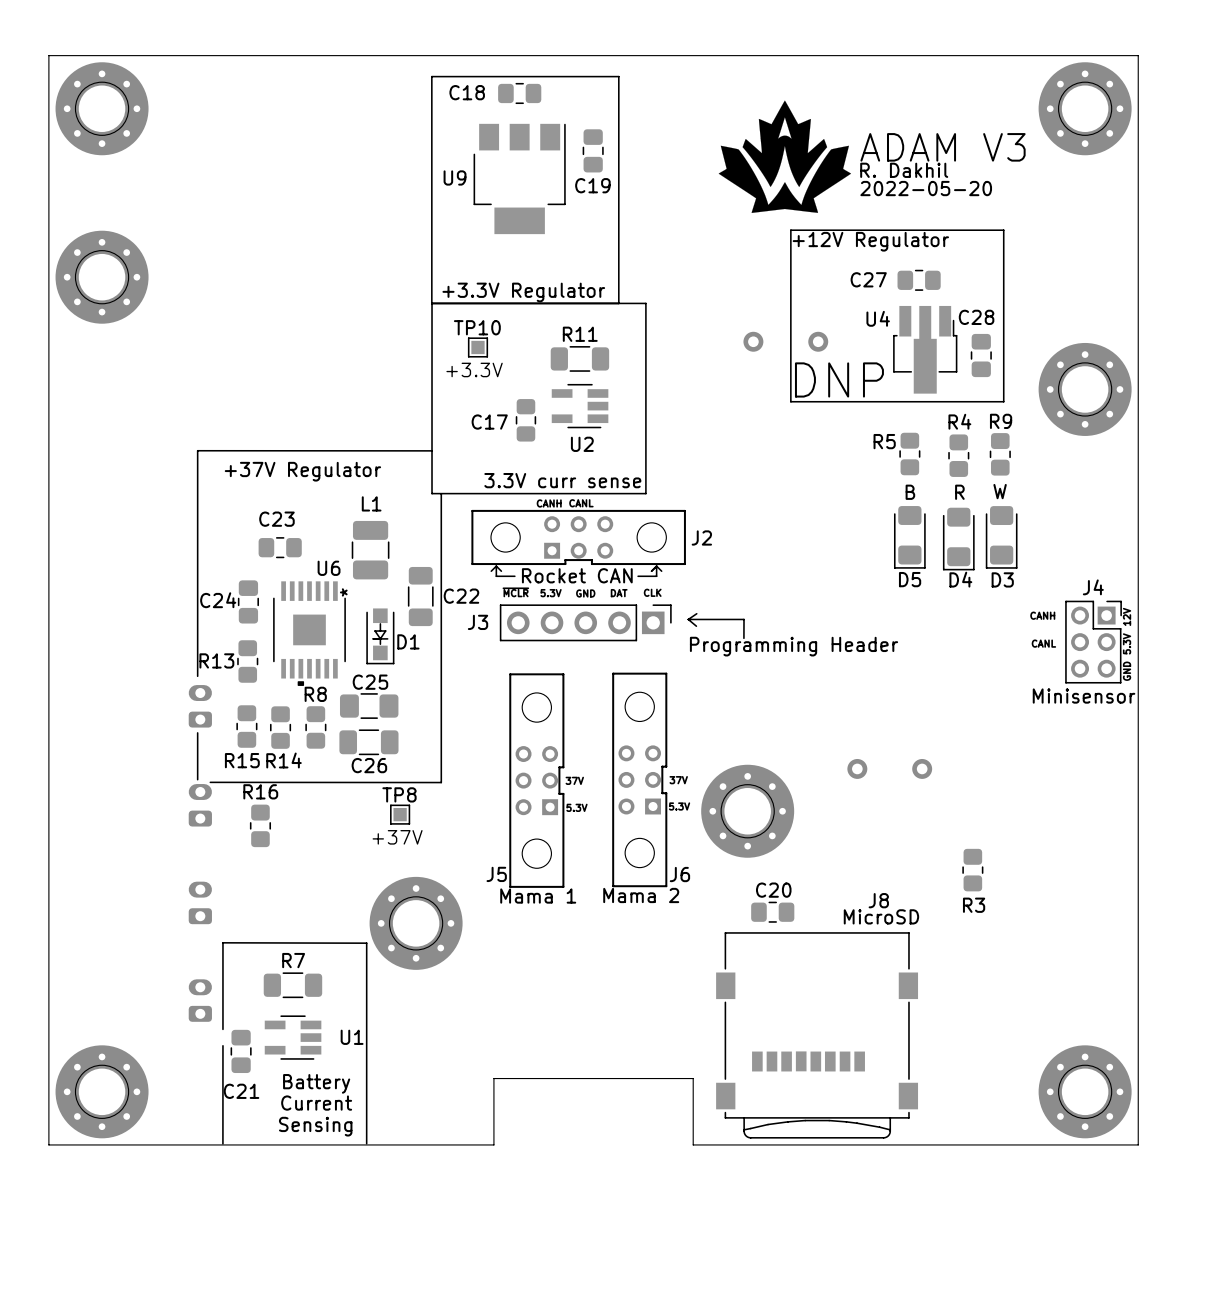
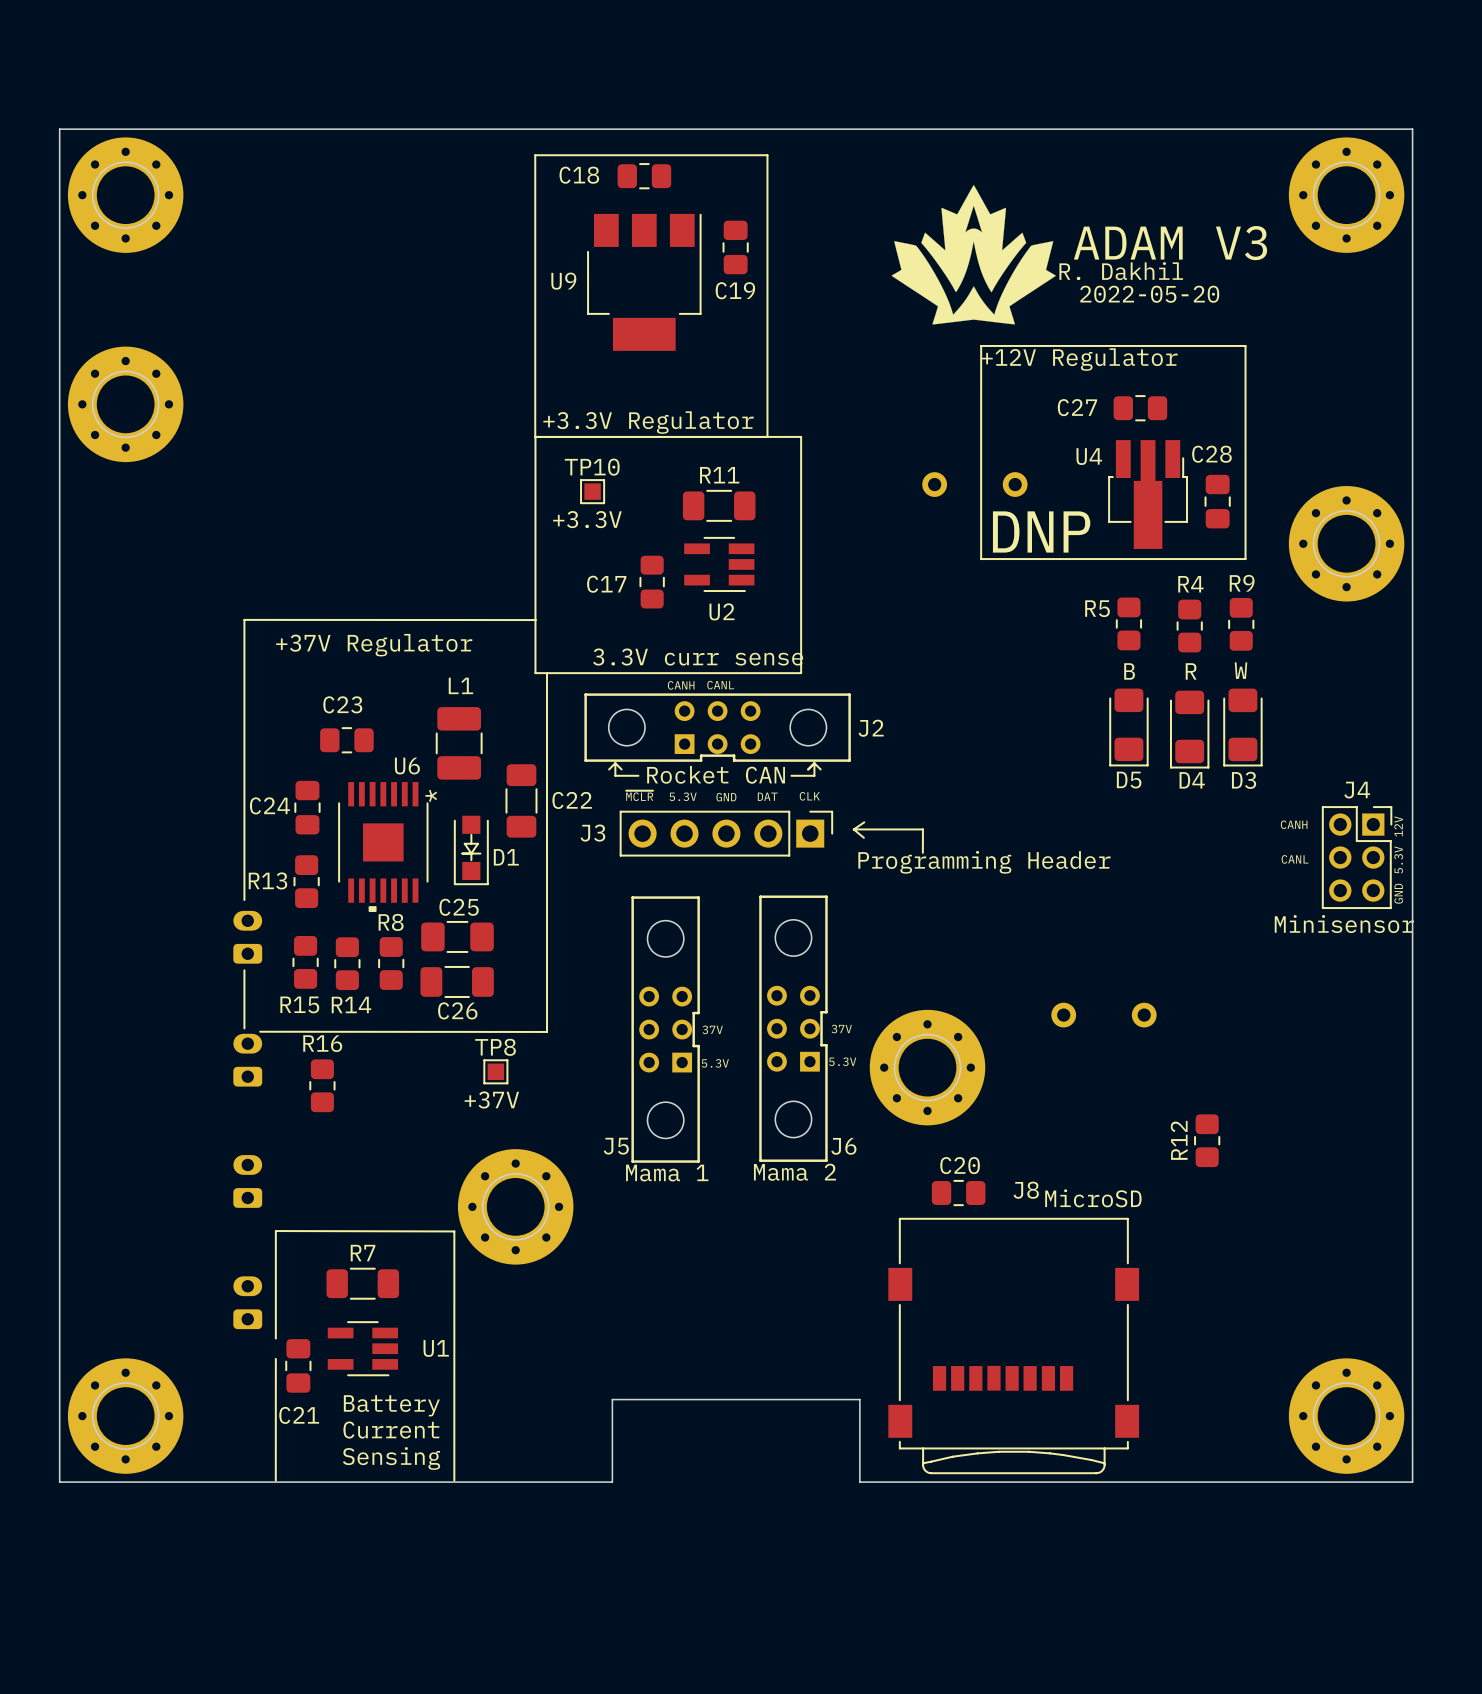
J8 name position: J8 (878, 900) -> J8 (1026, 1190)
R3 name: R3 (974, 905) -> R12 (1179, 1140)

